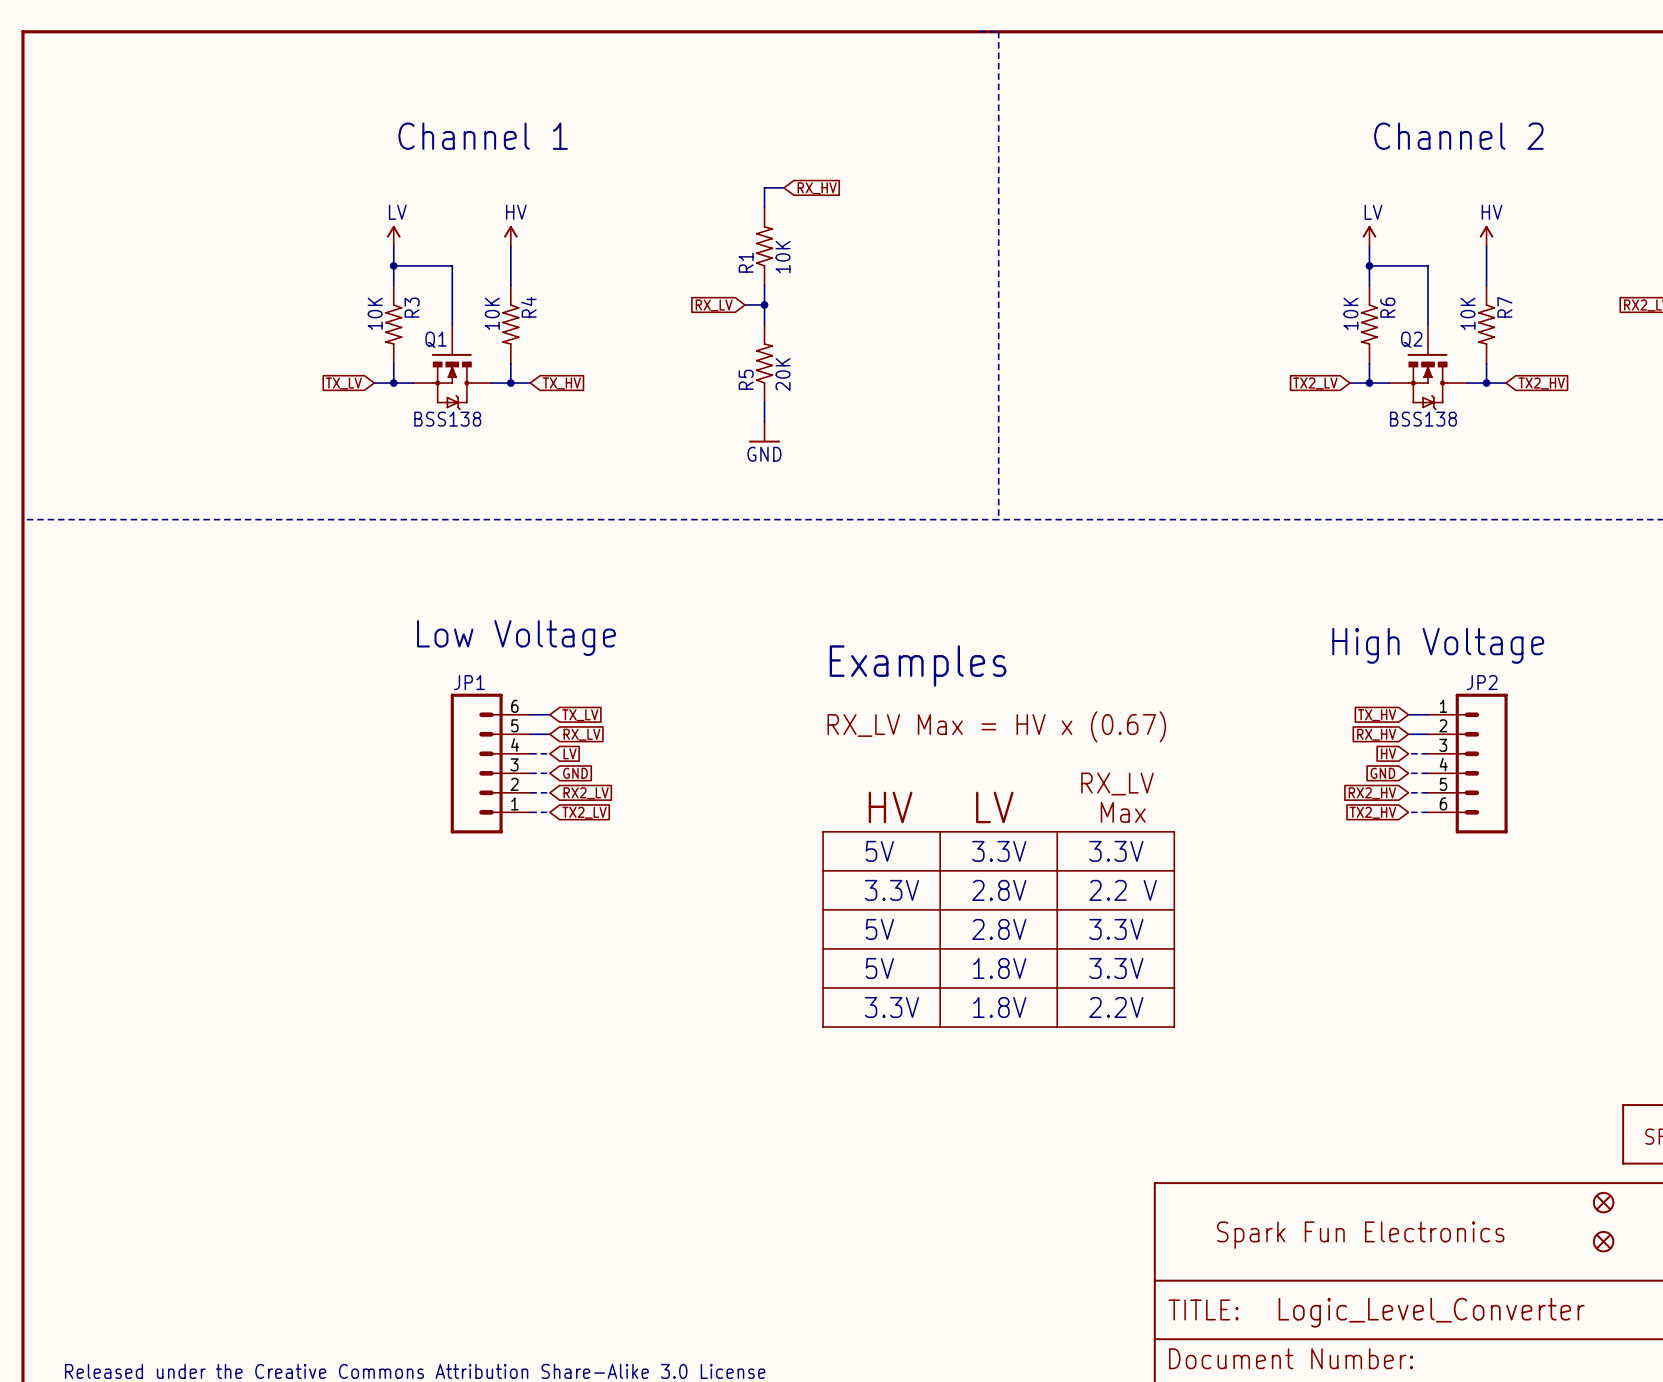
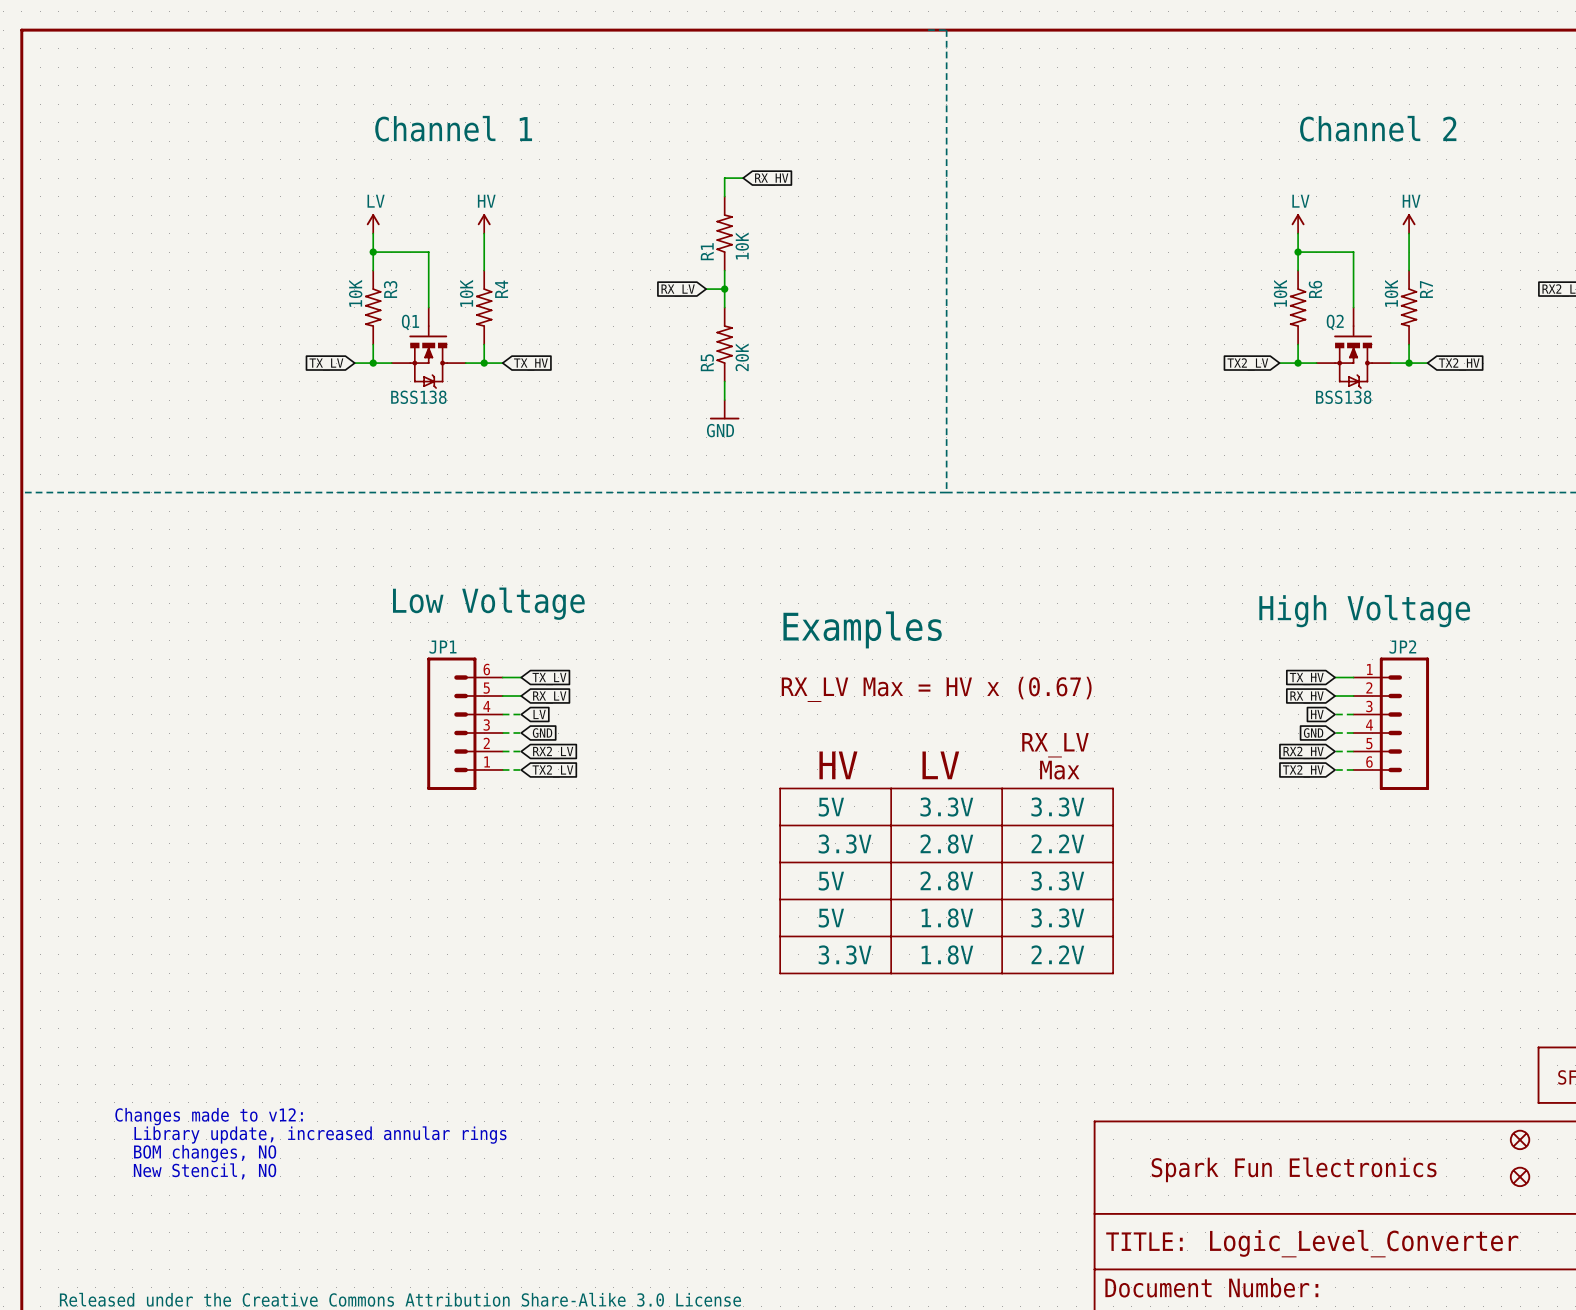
text: 2.2 V (1123, 890) -> 2.2V (1057, 843)
text: none -> Changes made to v12: (209, 1116)
text: none -> Library update, increased annular rings (320, 1135)
text: none -> BOM changes, NO (205, 1153)
text: none -> New Stencil, NO (205, 1171)

